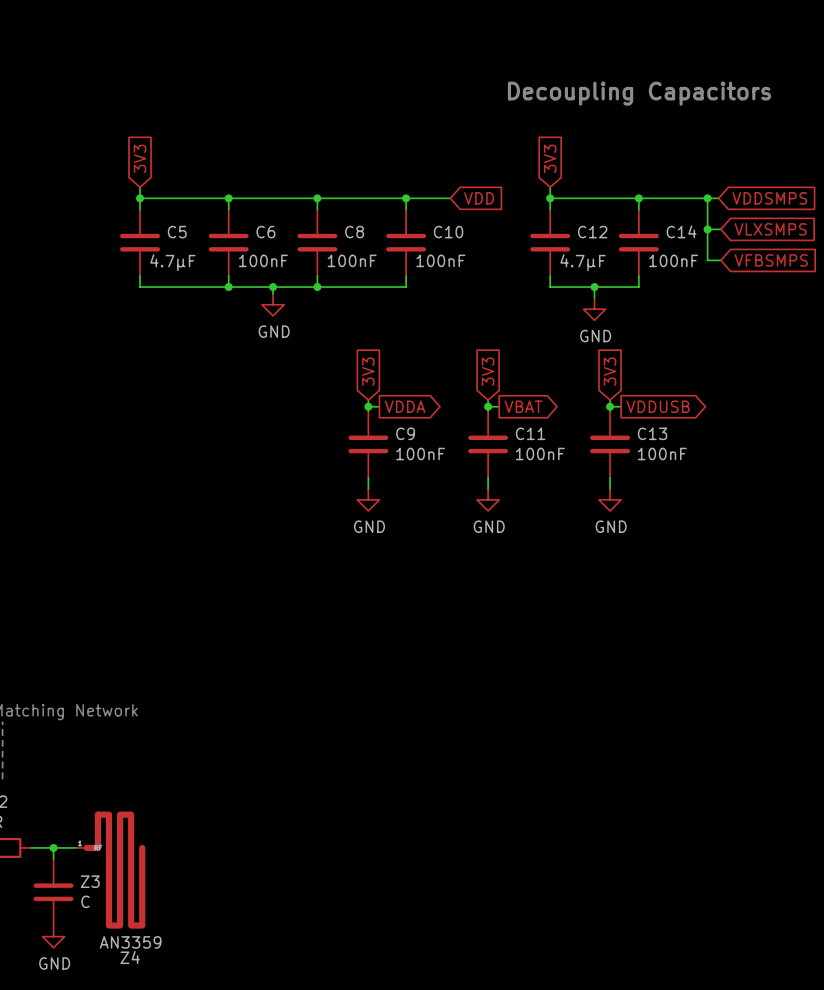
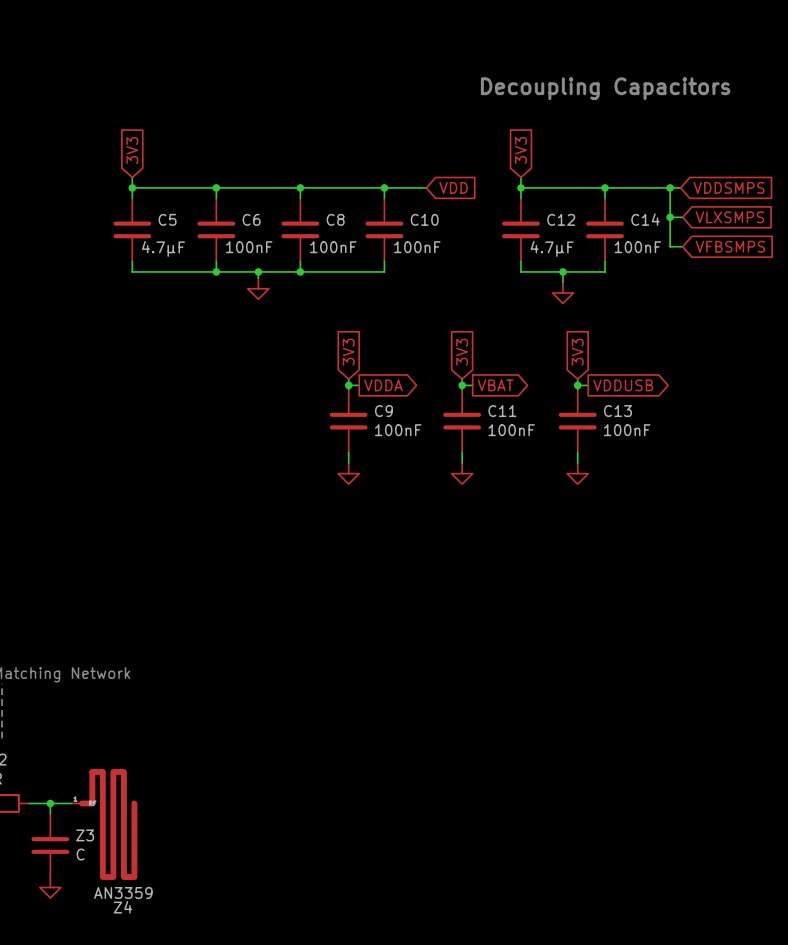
power symbol text: GND (274, 331) -> none
power symbol text: GND (595, 336) -> none
power symbol text: GND (369, 526) -> none
power symbol text: GND (489, 526) -> none
power symbol text: GND (611, 526) -> none
power symbol text: GND (54, 963) -> none

